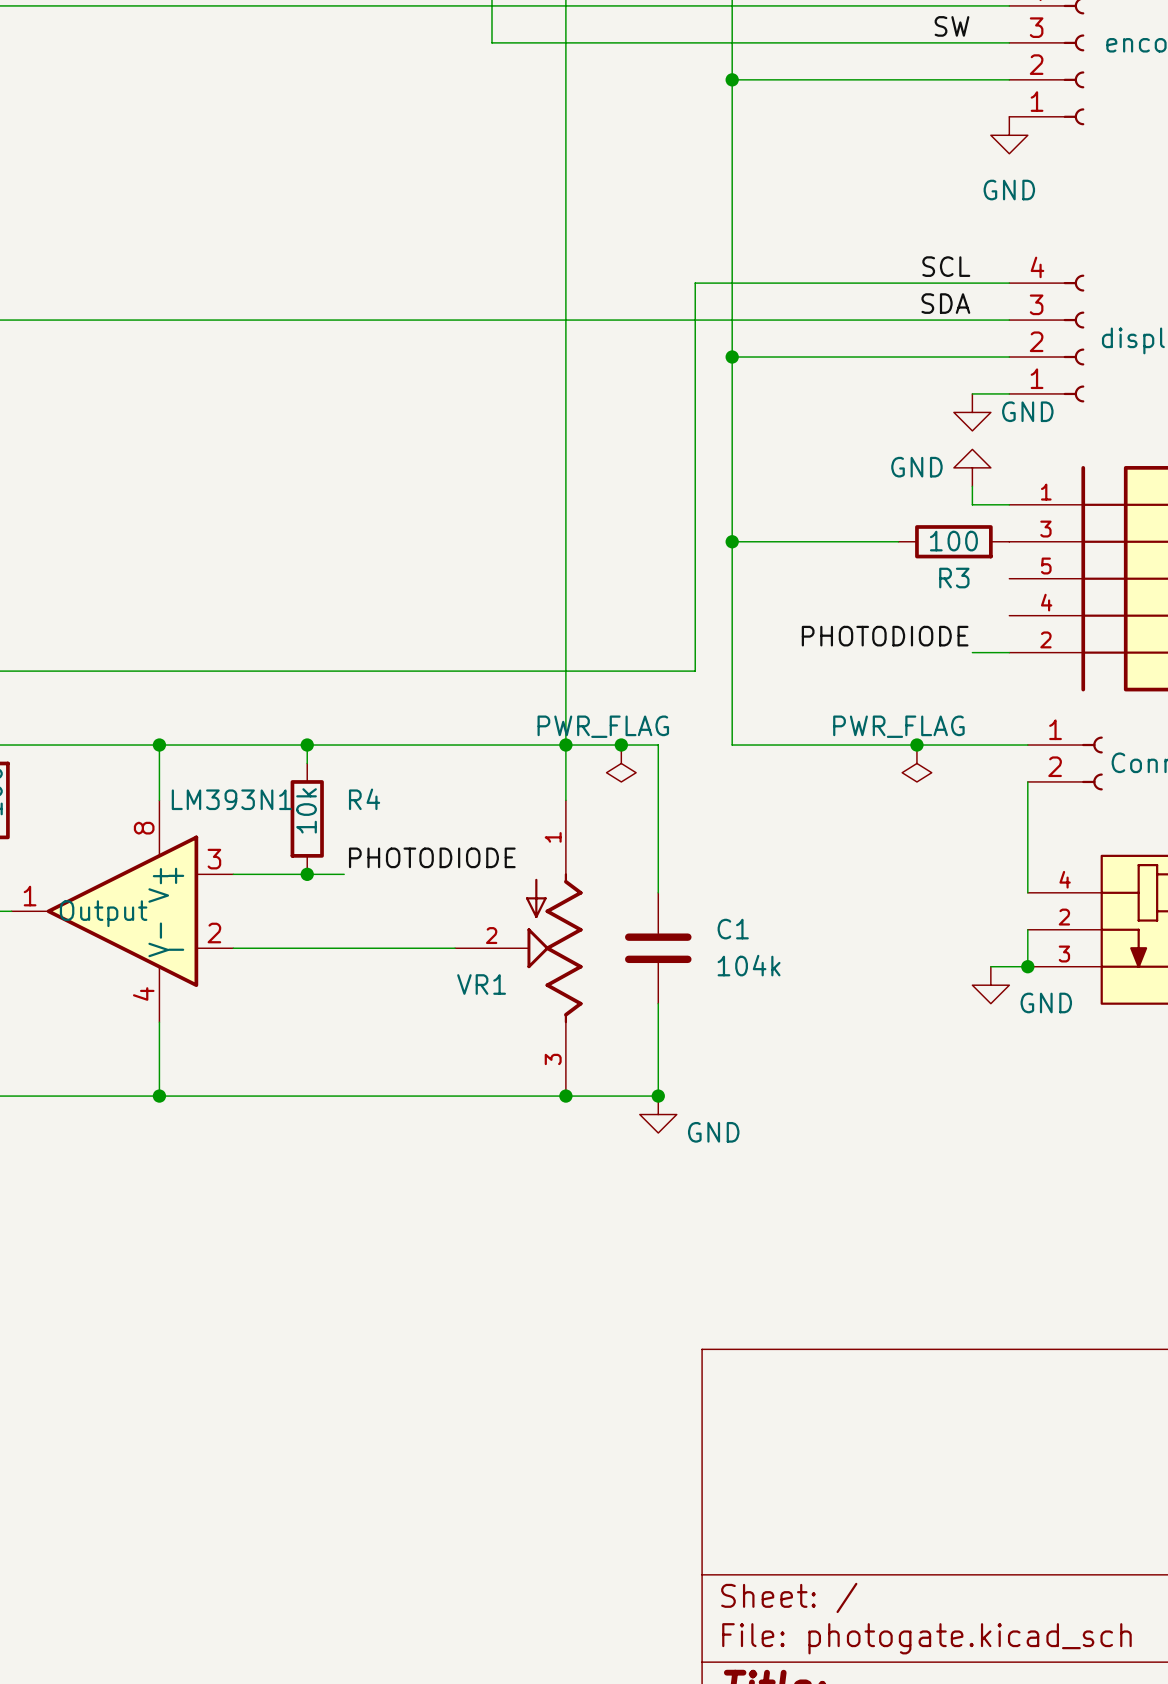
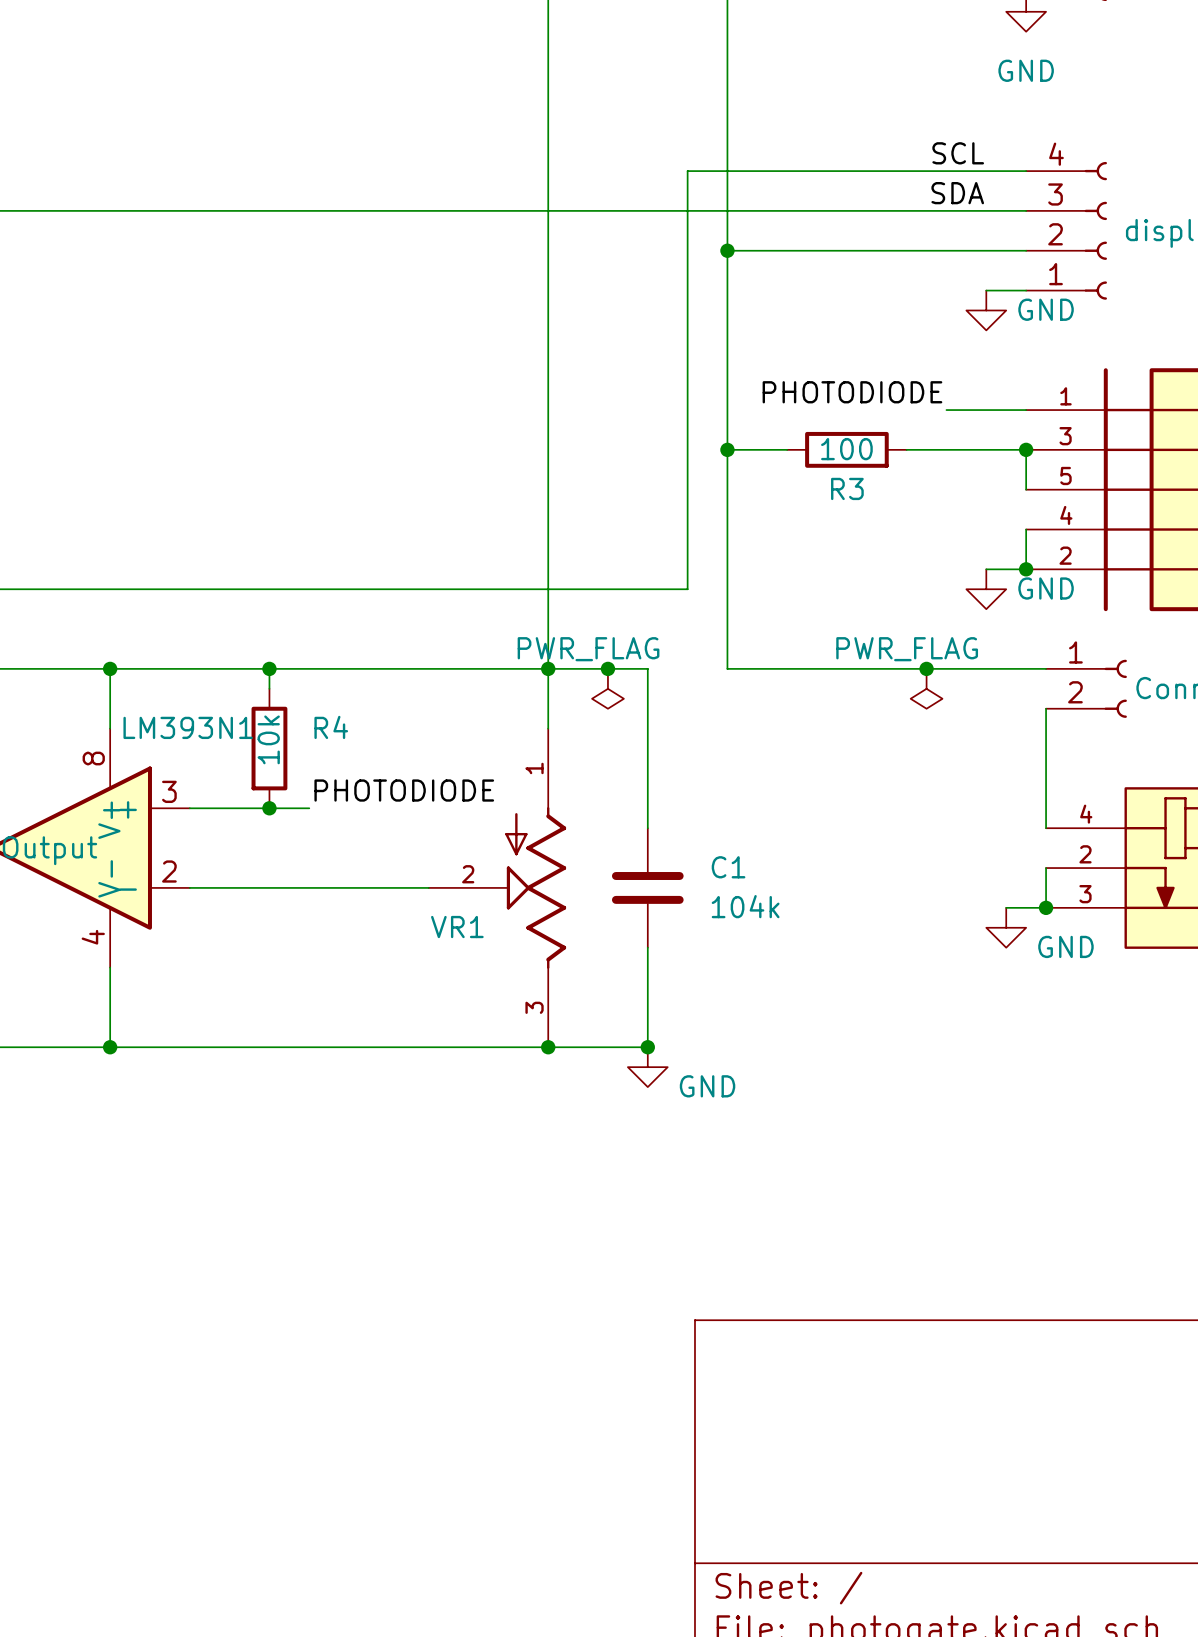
power symbol rotation: 0° (972, 467) -> 180° (986, 589)
power symbol position: GND (972, 467) -> GND (986, 589)
wire: (972, 486) (972, 504) -> (946, 410) (986, 410)
wire: (787, 541) (898, 541) -> (1026, 489) (1026, 449) (906, 449)
R3 position: (953, 541) -> (846, 449)
junction: none -> (1026, 449)
wire: none -> (1026, 529) (1026, 569)
label position: PHOTODIODE (885, 636) -> PHOTODIODE (852, 392)
junction: none -> (1026, 569)

